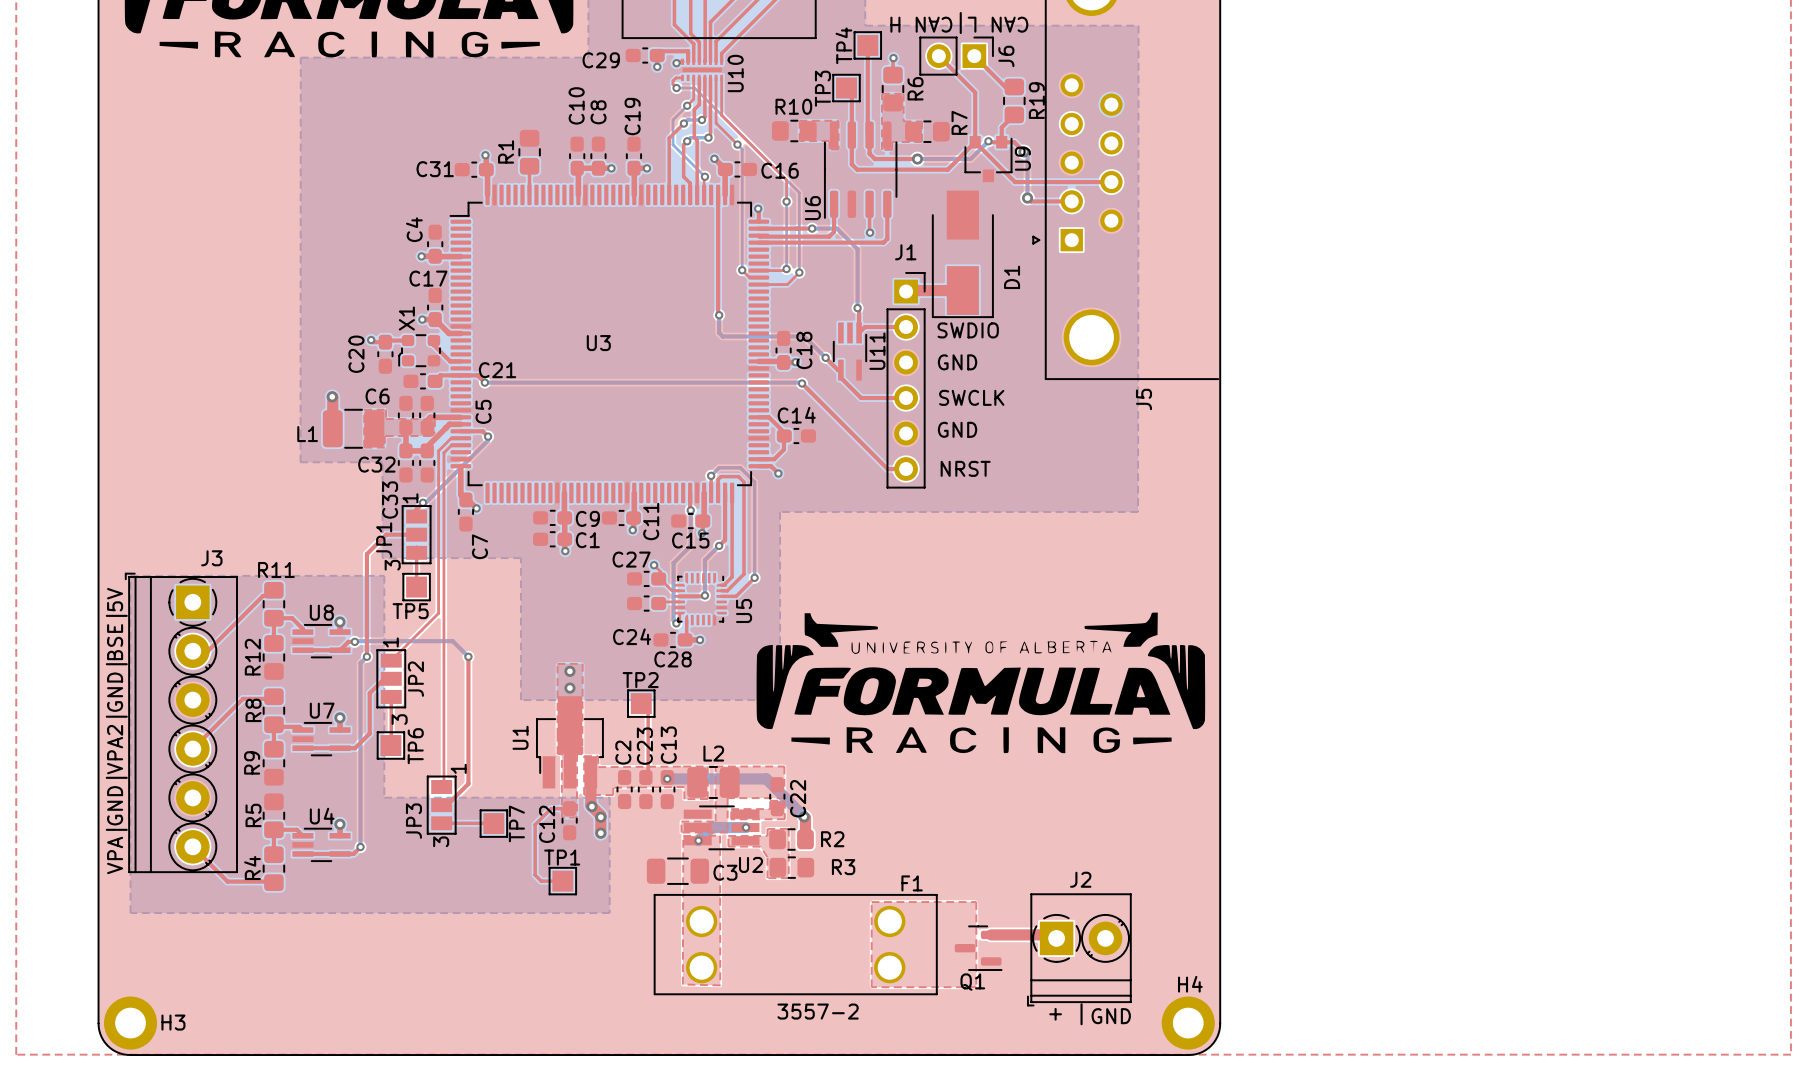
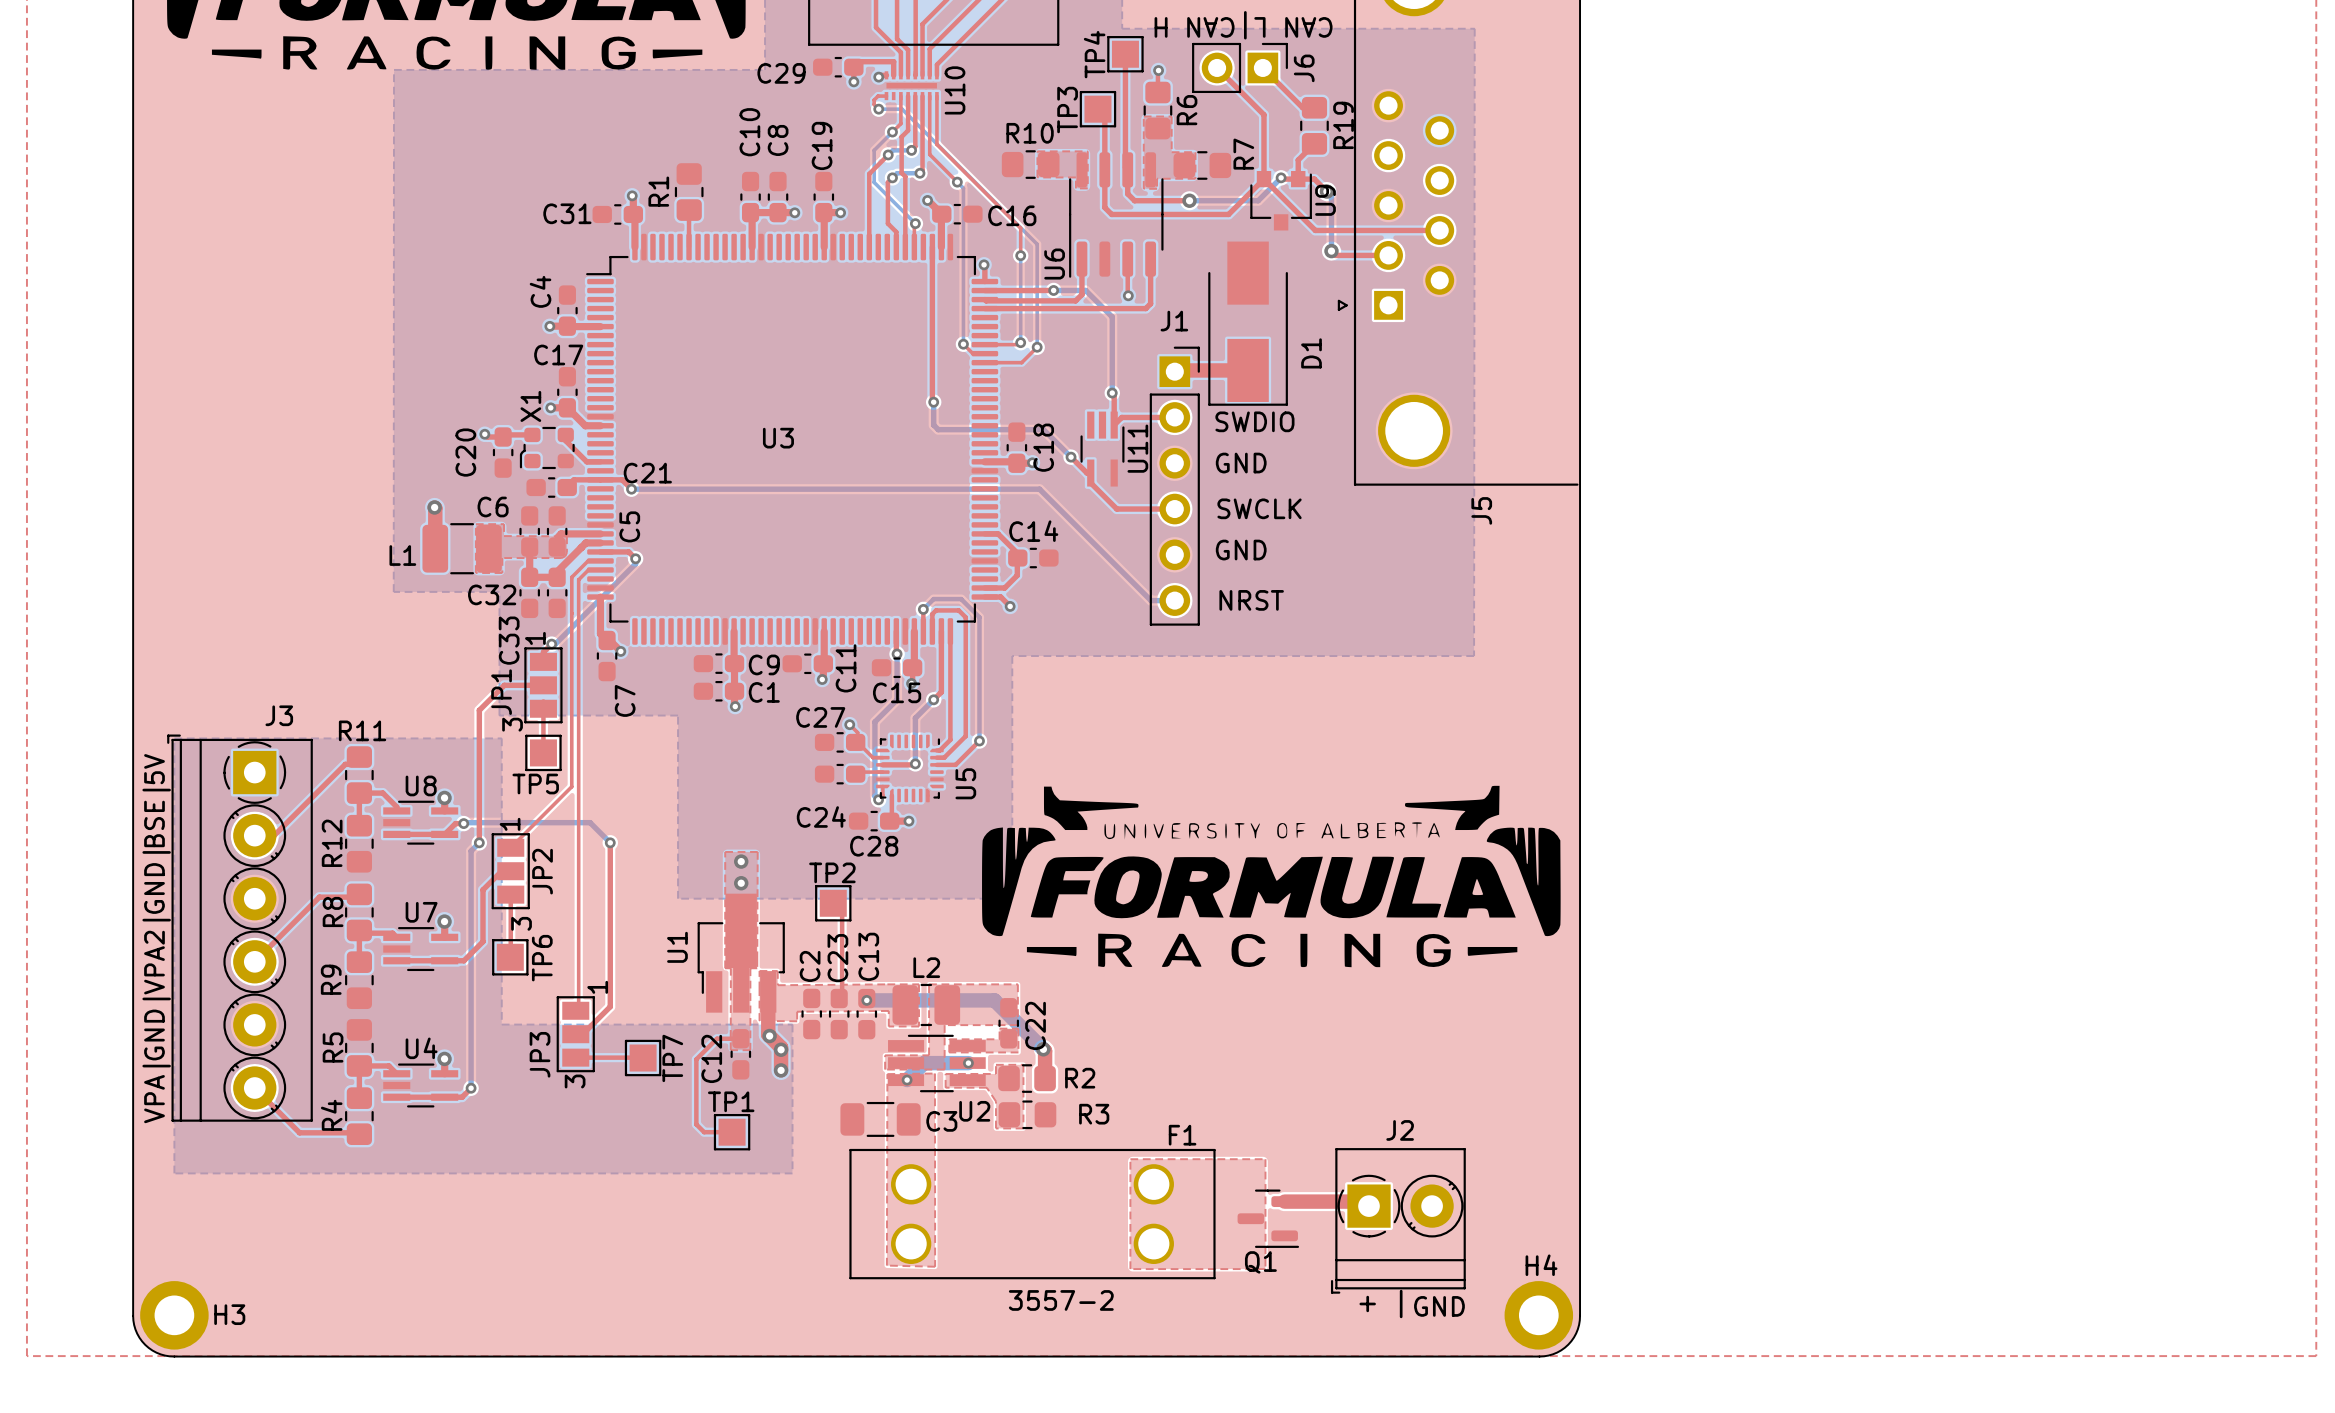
top track: (801, 382) (887, 469) (906, 469) -> none
bottom track: none -> (1040, 490) (1151, 600) (1174, 600)
via: (802, 383) -> none

